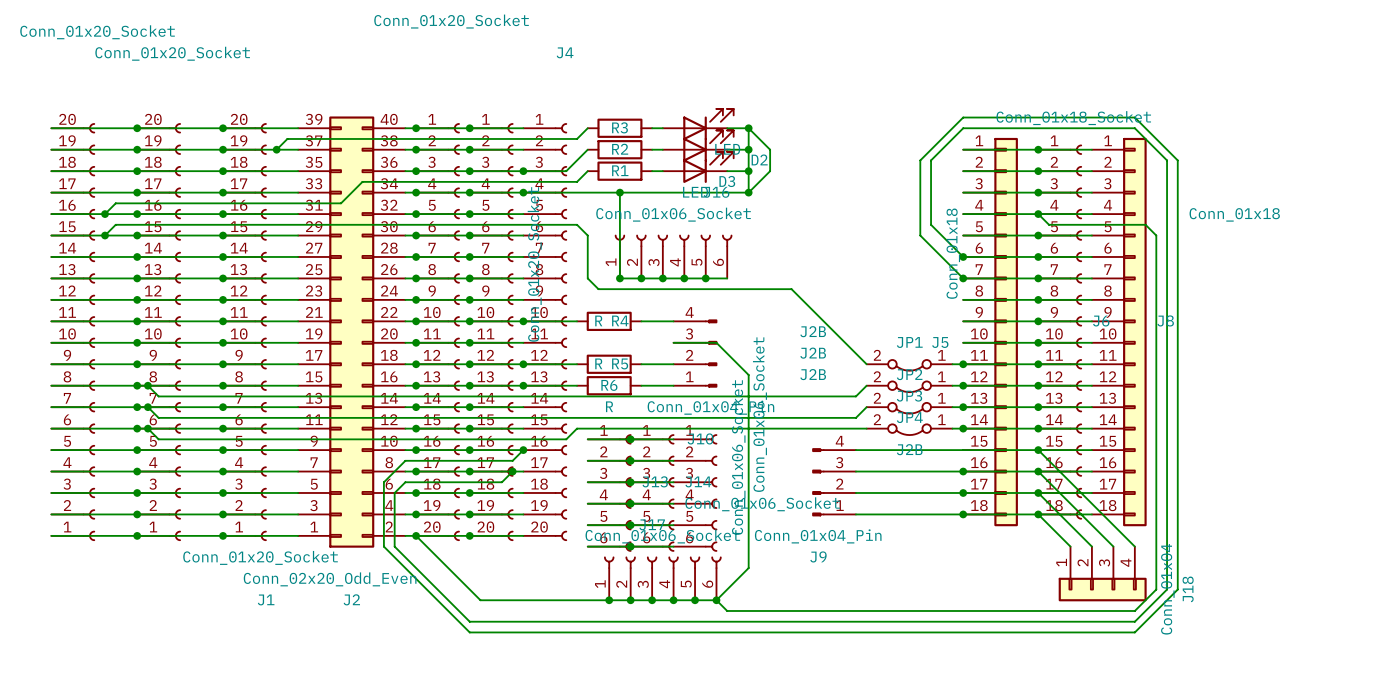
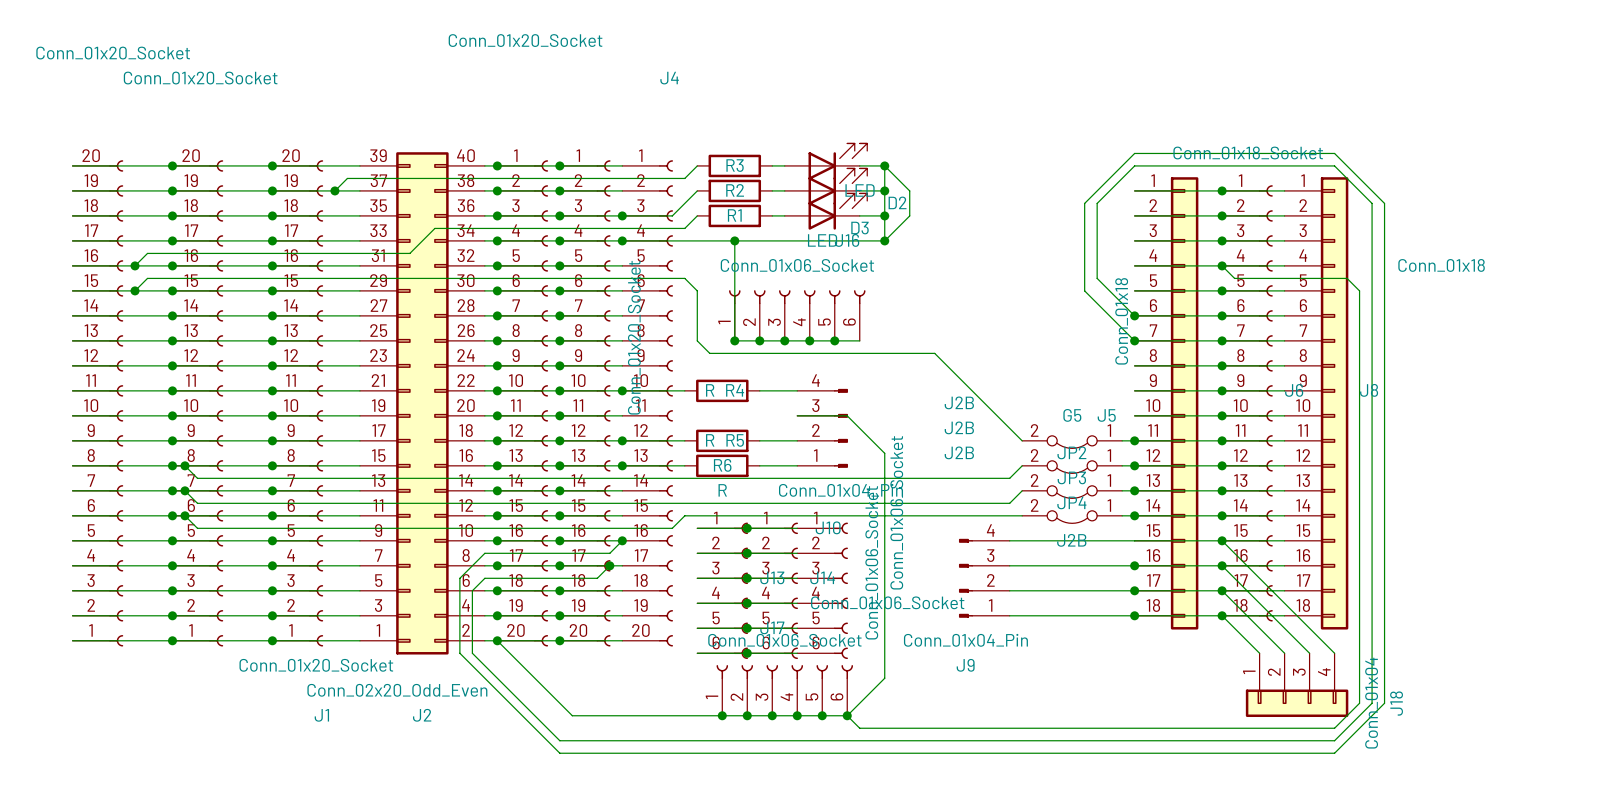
JP1 name: JP1 (909, 342) -> G5 (1072, 415)

